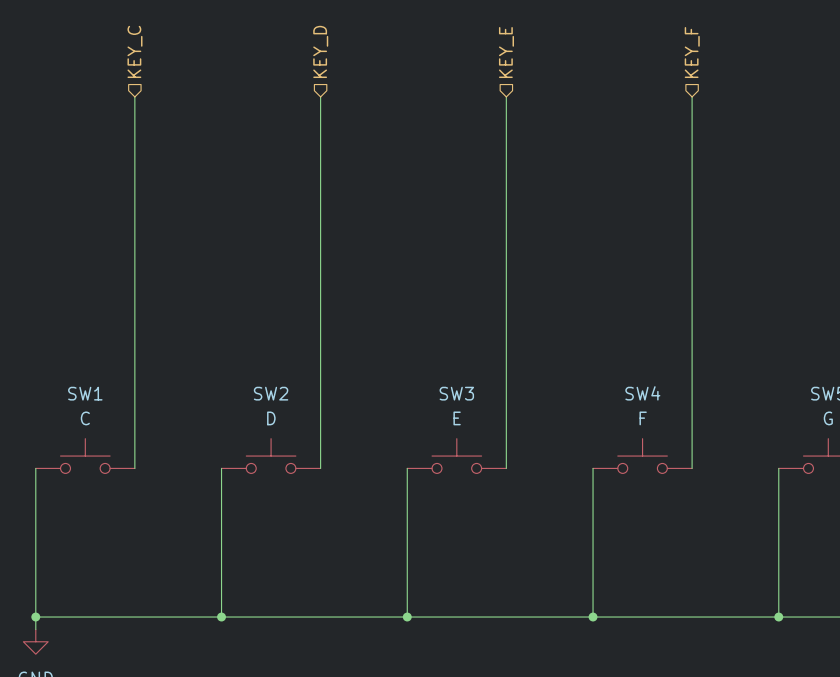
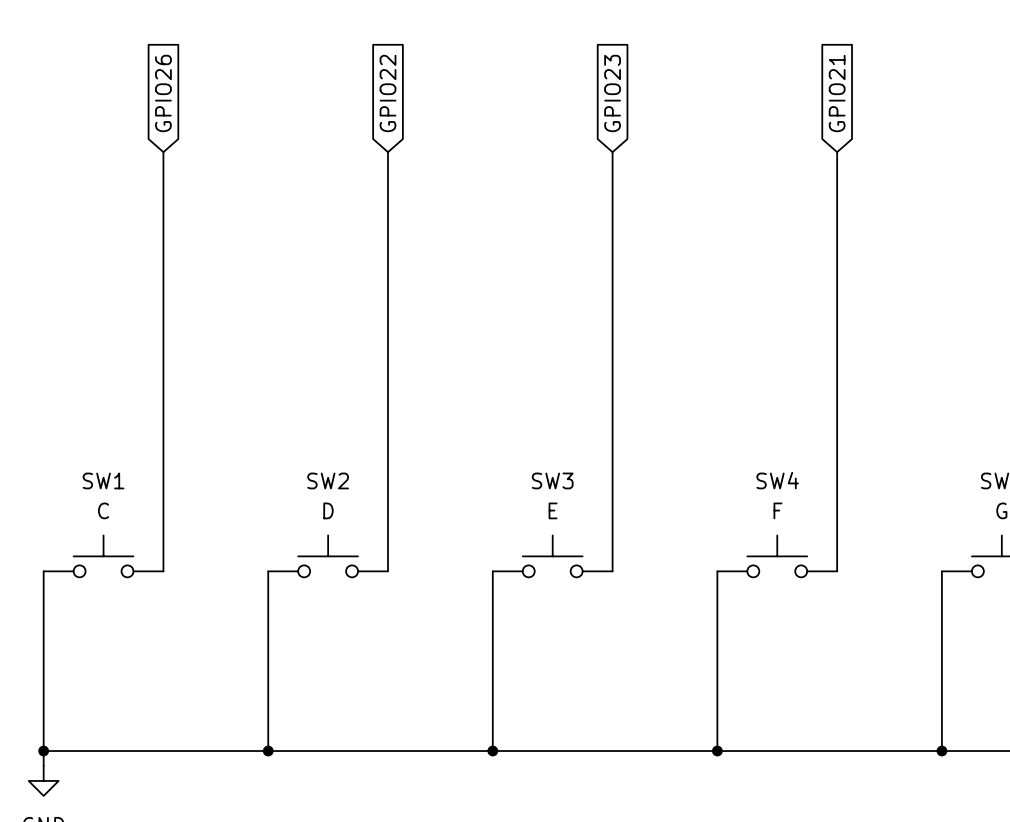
hierarchical label: KEY_C (134, 51) -> none
hierarchical label: KEY_D (320, 51) -> none
hierarchical label: KEY_E (506, 52) -> none
hierarchical label: KEY_F (692, 52) -> none
global label: none -> GPIO26 (163, 93)
global label: none -> GPIO22 (388, 93)
global label: none -> GPIO23 (612, 93)
global label: none -> GPIO21 (837, 93)
wire: (134, 96) (134, 121) -> none
wire: (320, 96) (320, 121) -> none
wire: (506, 96) (506, 121) -> none
wire: (692, 96) (692, 121) -> none

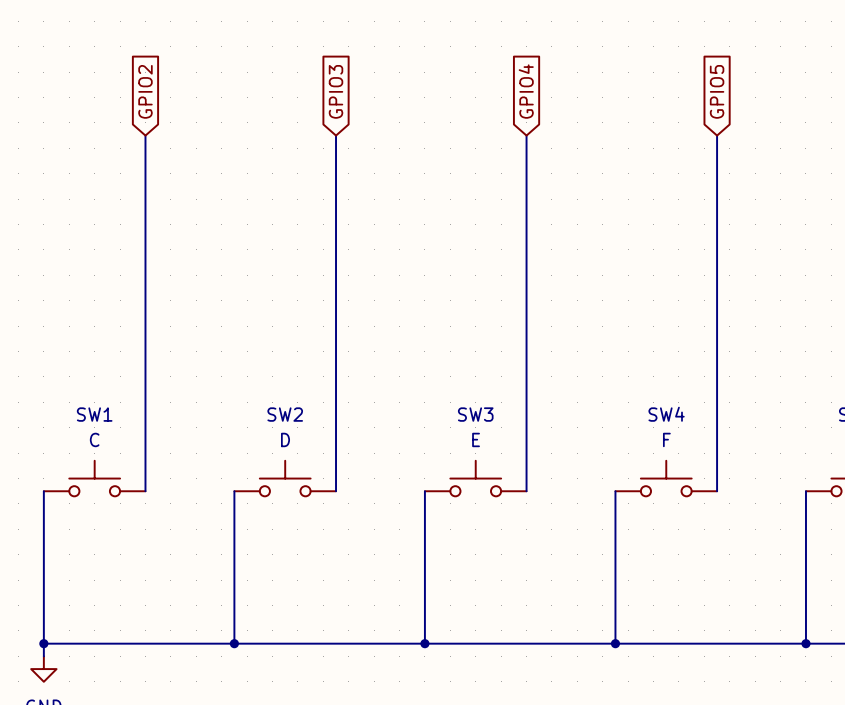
global label: GPIO26 (163, 93) -> GPIO2 (145, 91)
global label: GPIO22 (388, 93) -> GPIO3 (336, 91)
global label: GPIO23 (612, 93) -> GPIO4 (526, 91)
global label: GPIO21 (837, 93) -> GPIO5 (717, 91)

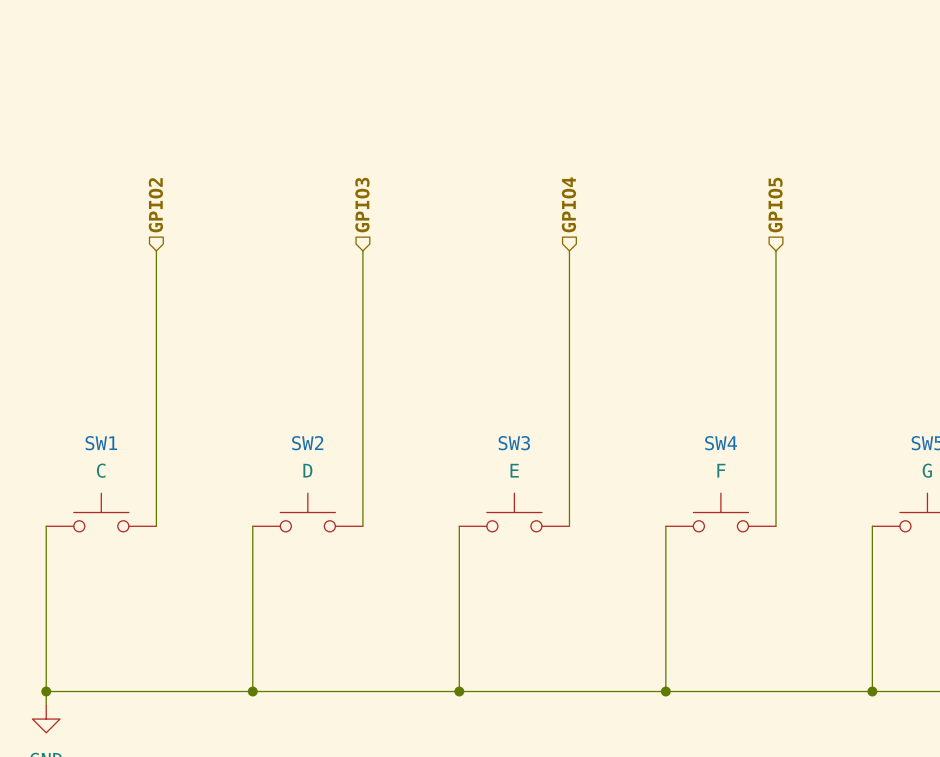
global label: GPIO2 (145, 91) -> none
global label: GPIO3 (336, 91) -> none
global label: GPIO4 (526, 91) -> none
global label: GPIO5 (717, 91) -> none
wire: (145, 135) (145, 237) -> none
wire: (336, 135) (336, 237) -> none
wire: (526, 135) (526, 237) -> none
wire: (717, 135) (717, 237) -> none
hierarchical label: none -> GPIO2 (155, 205)
hierarchical label: none -> GPIO3 (362, 205)
hierarchical label: none -> GPIO4 (568, 204)
hierarchical label: none -> GPIO5 (775, 205)

